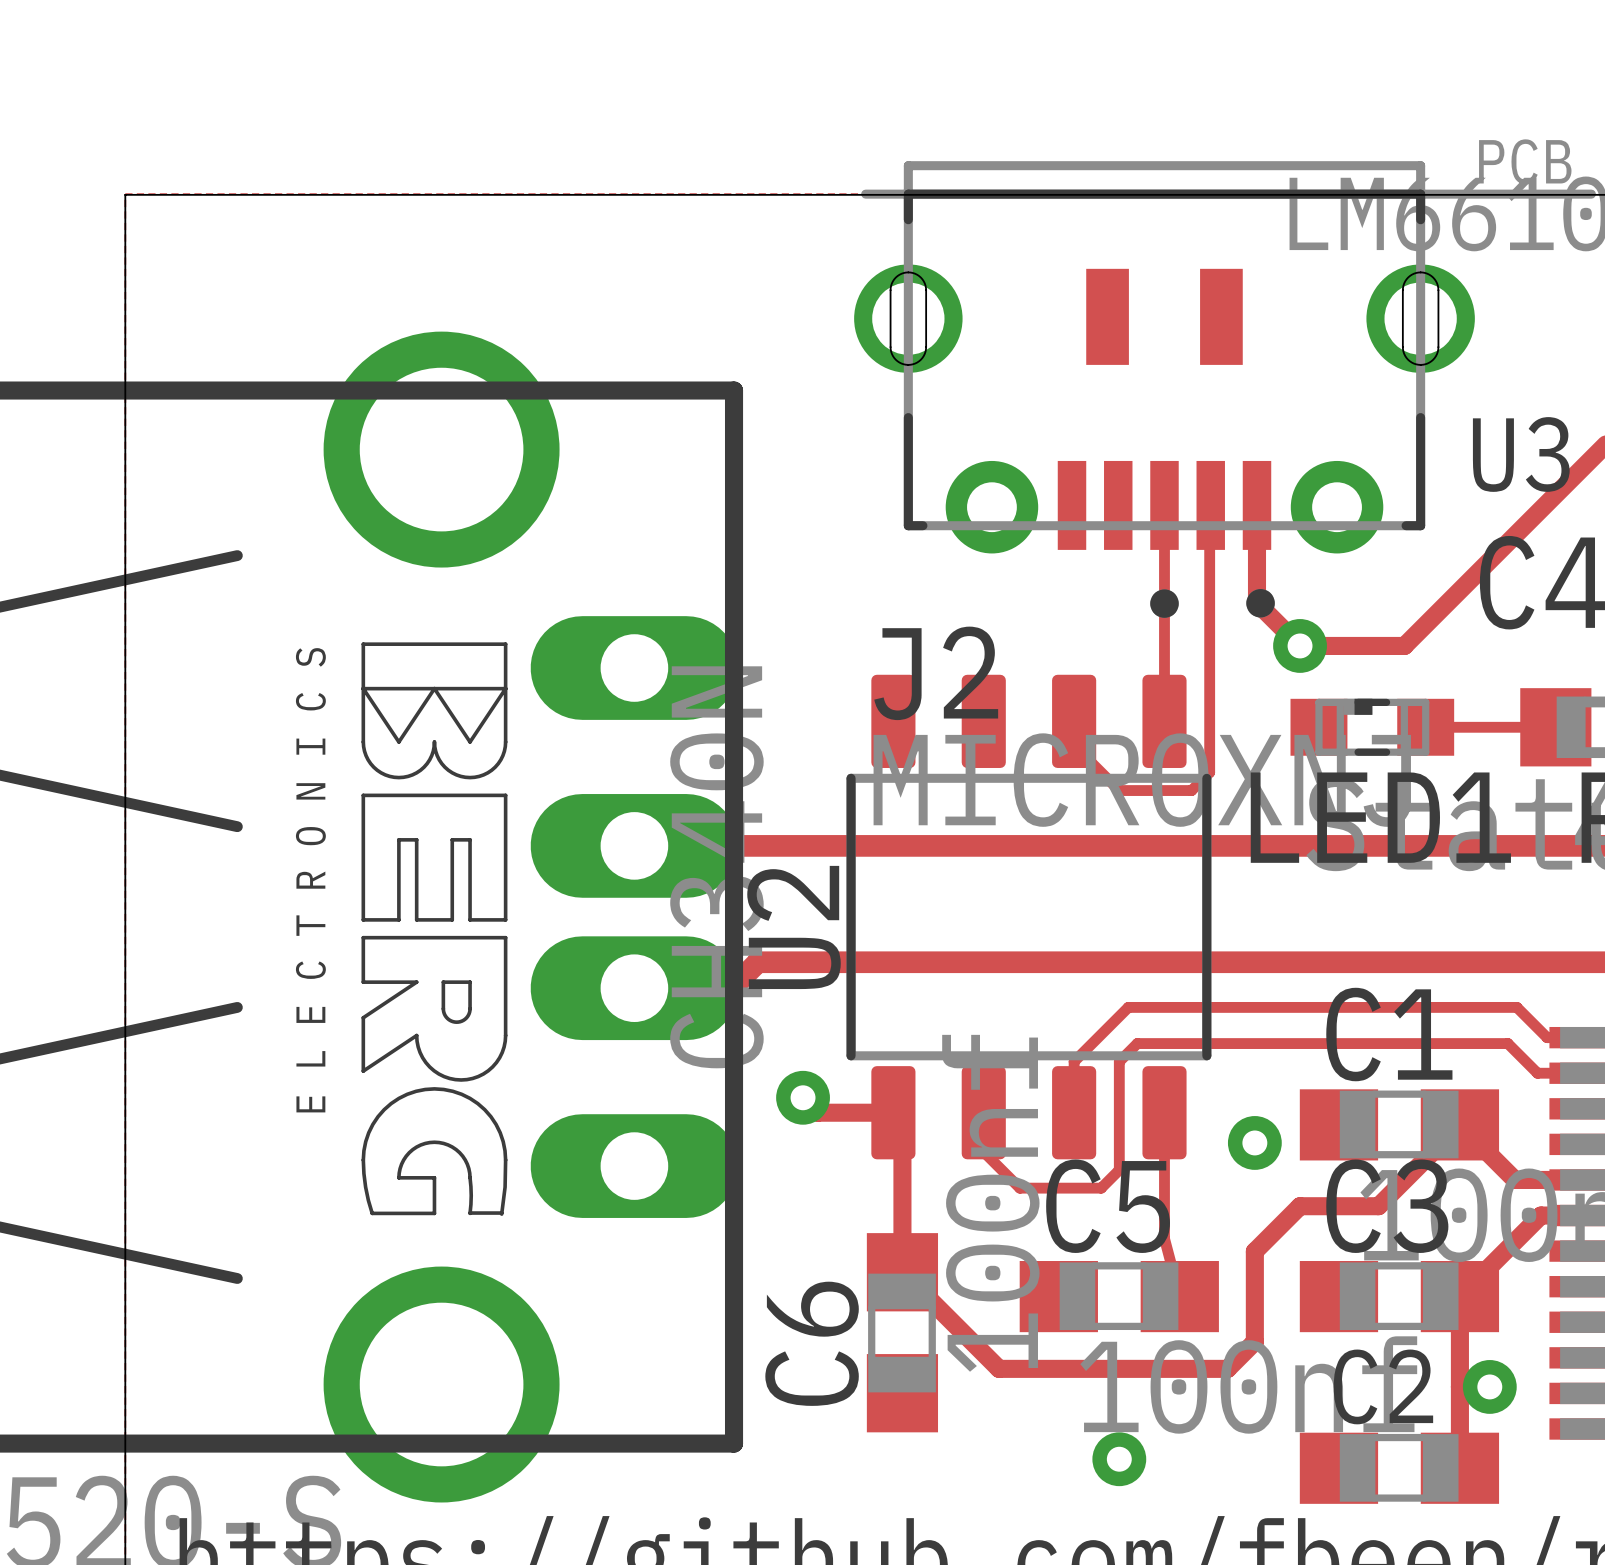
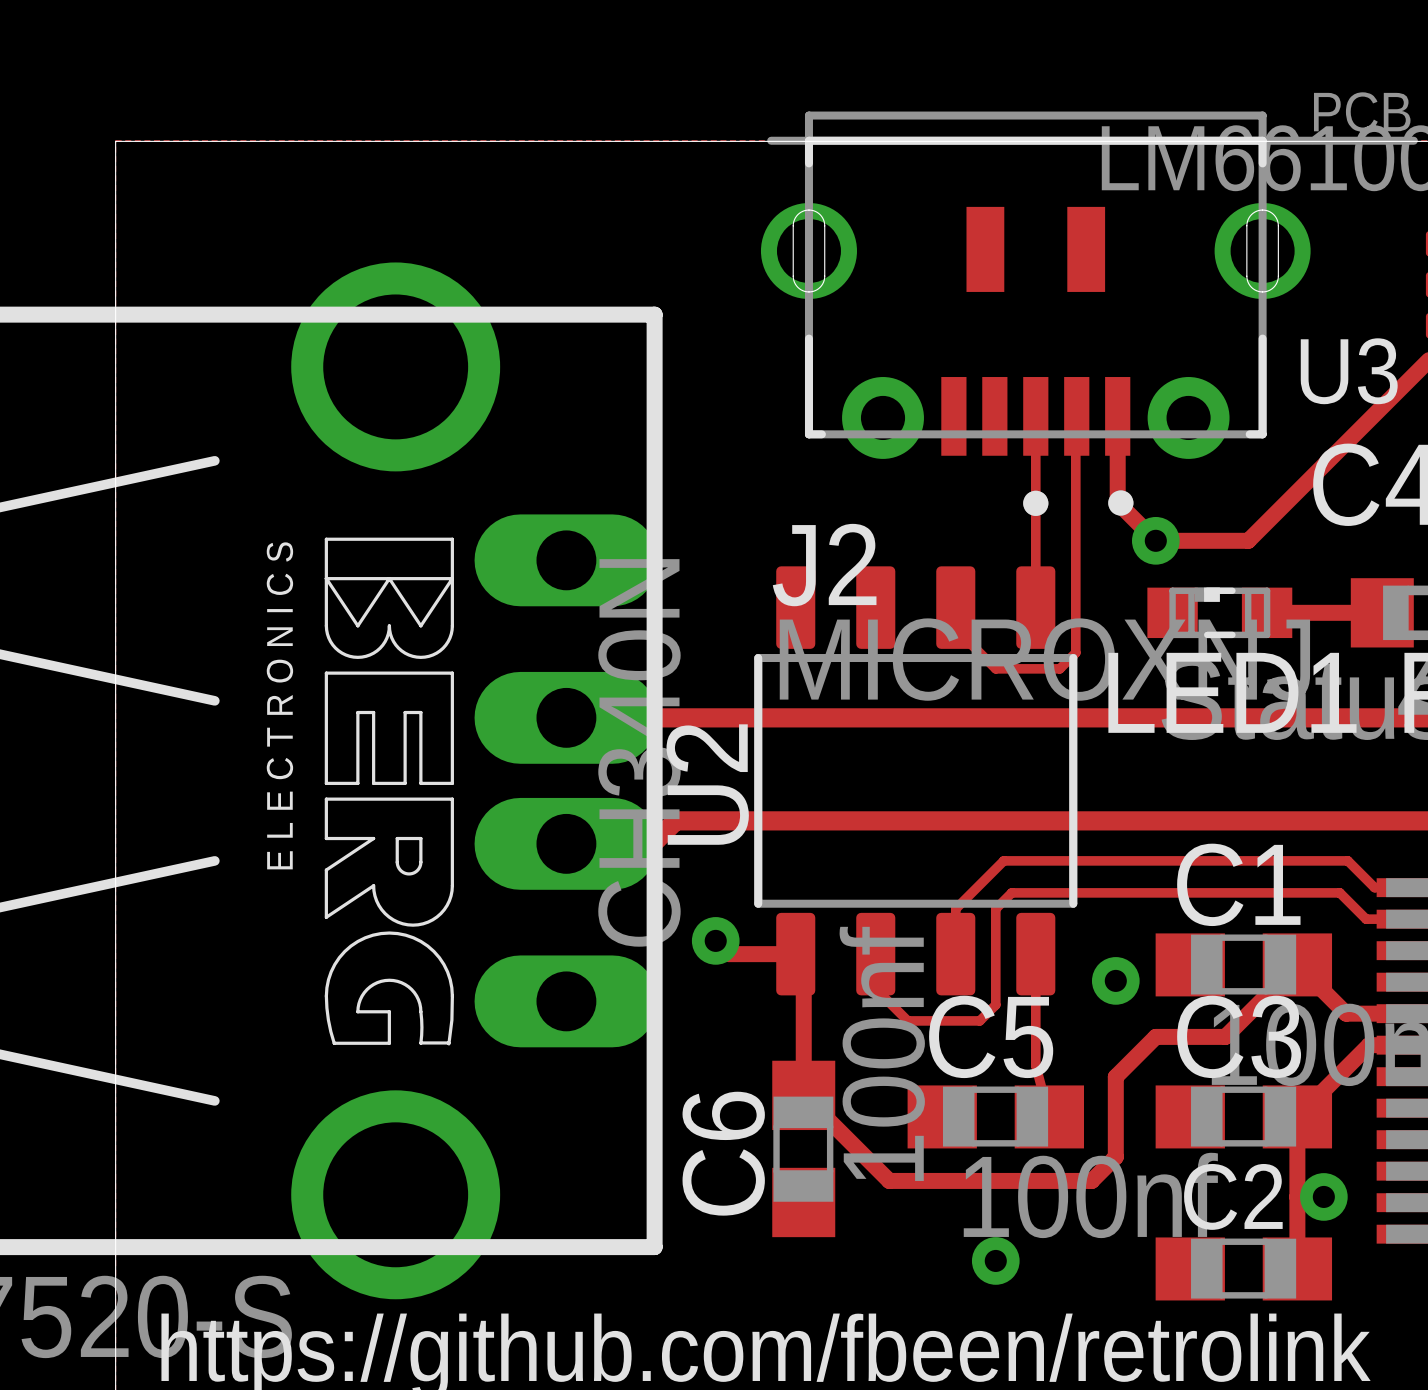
track width: thin (1425, 727) (1555, 727) -> thick (1267, 612) (1382, 612)

